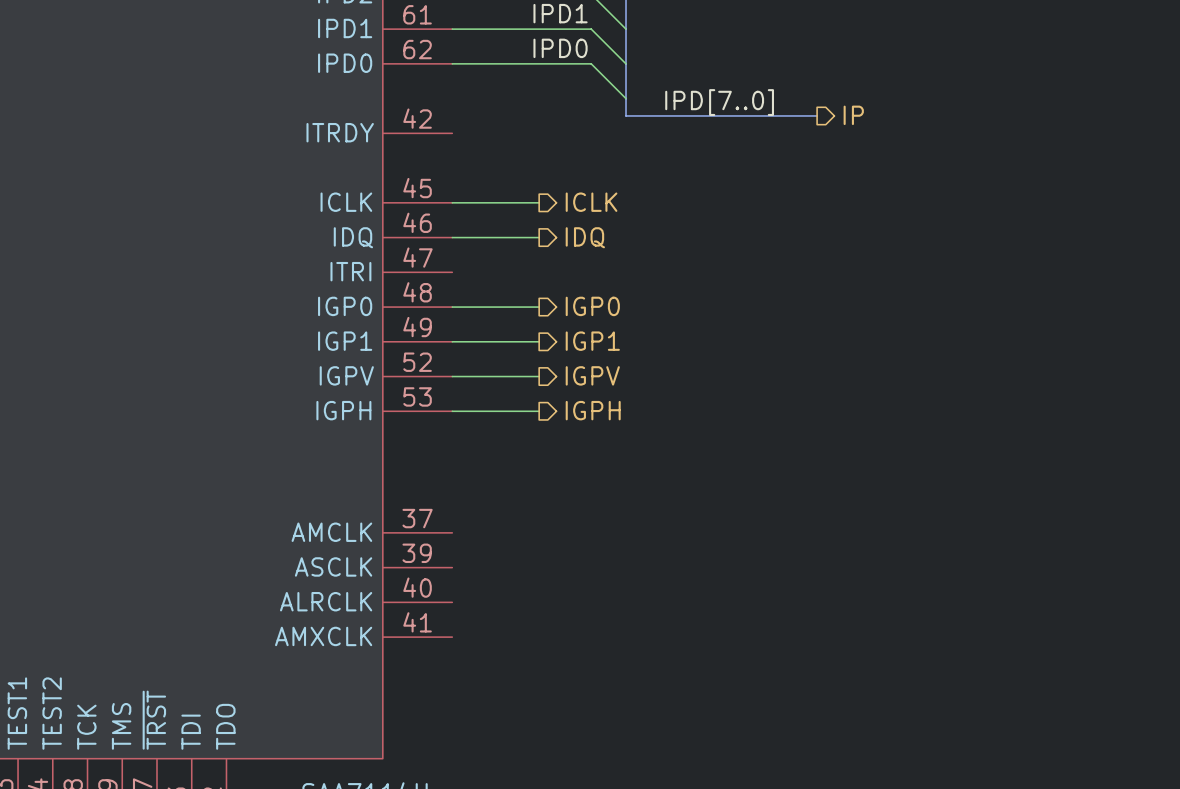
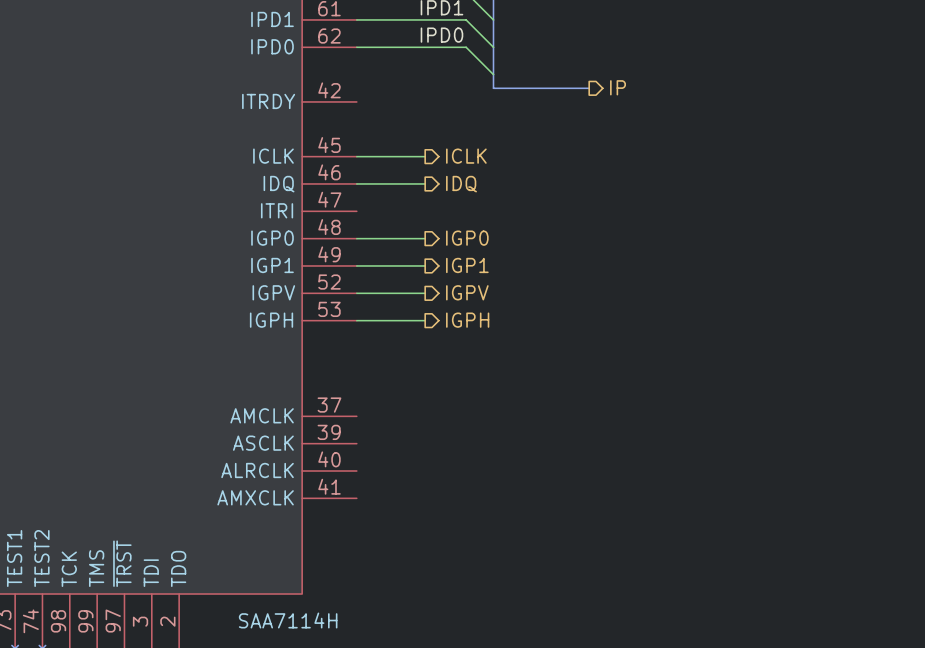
label: IPD[7..0] (719, 102) -> none
bus: (747, 115) (817, 115) -> none
hierarchical label position: IP (853, 115) -> IP (618, 87)

